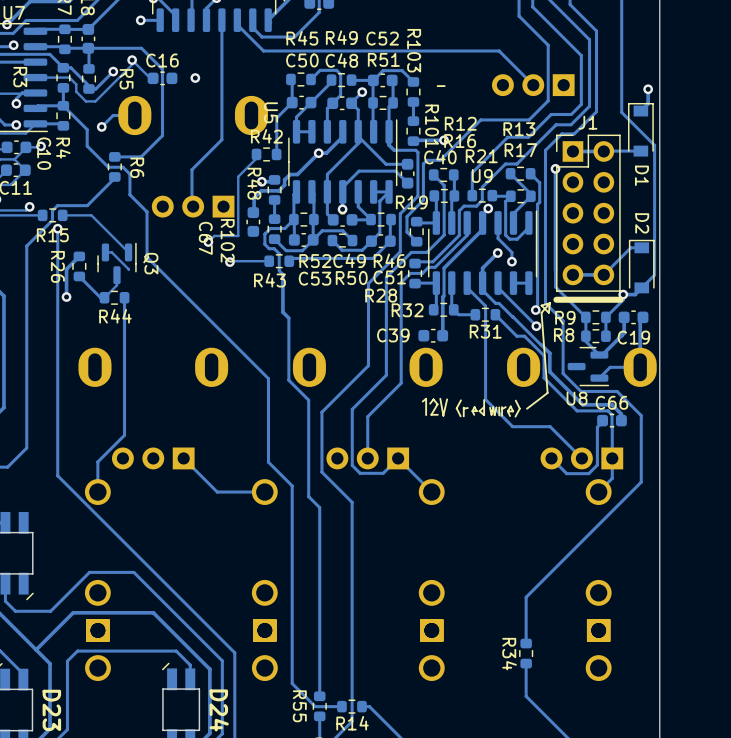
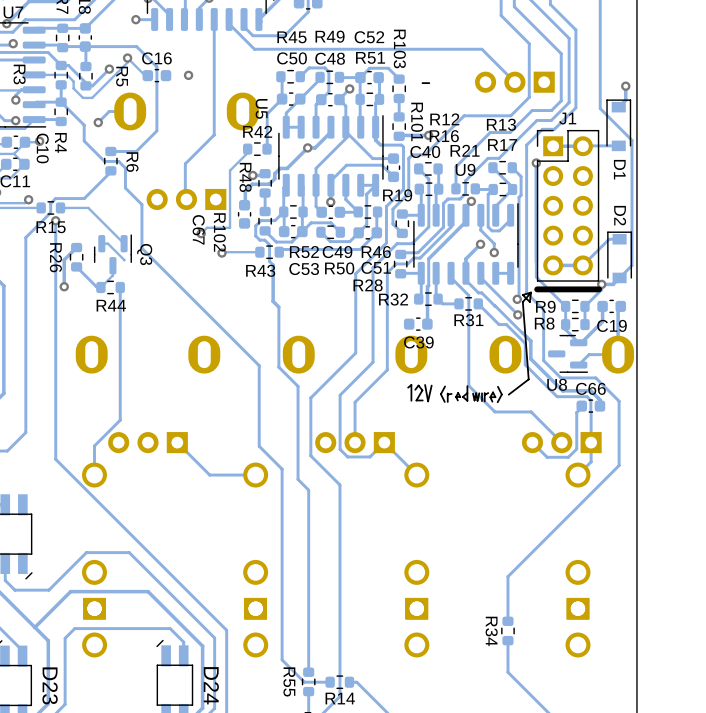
C39 name position: C39 (393, 335) -> C39 (418, 342)

